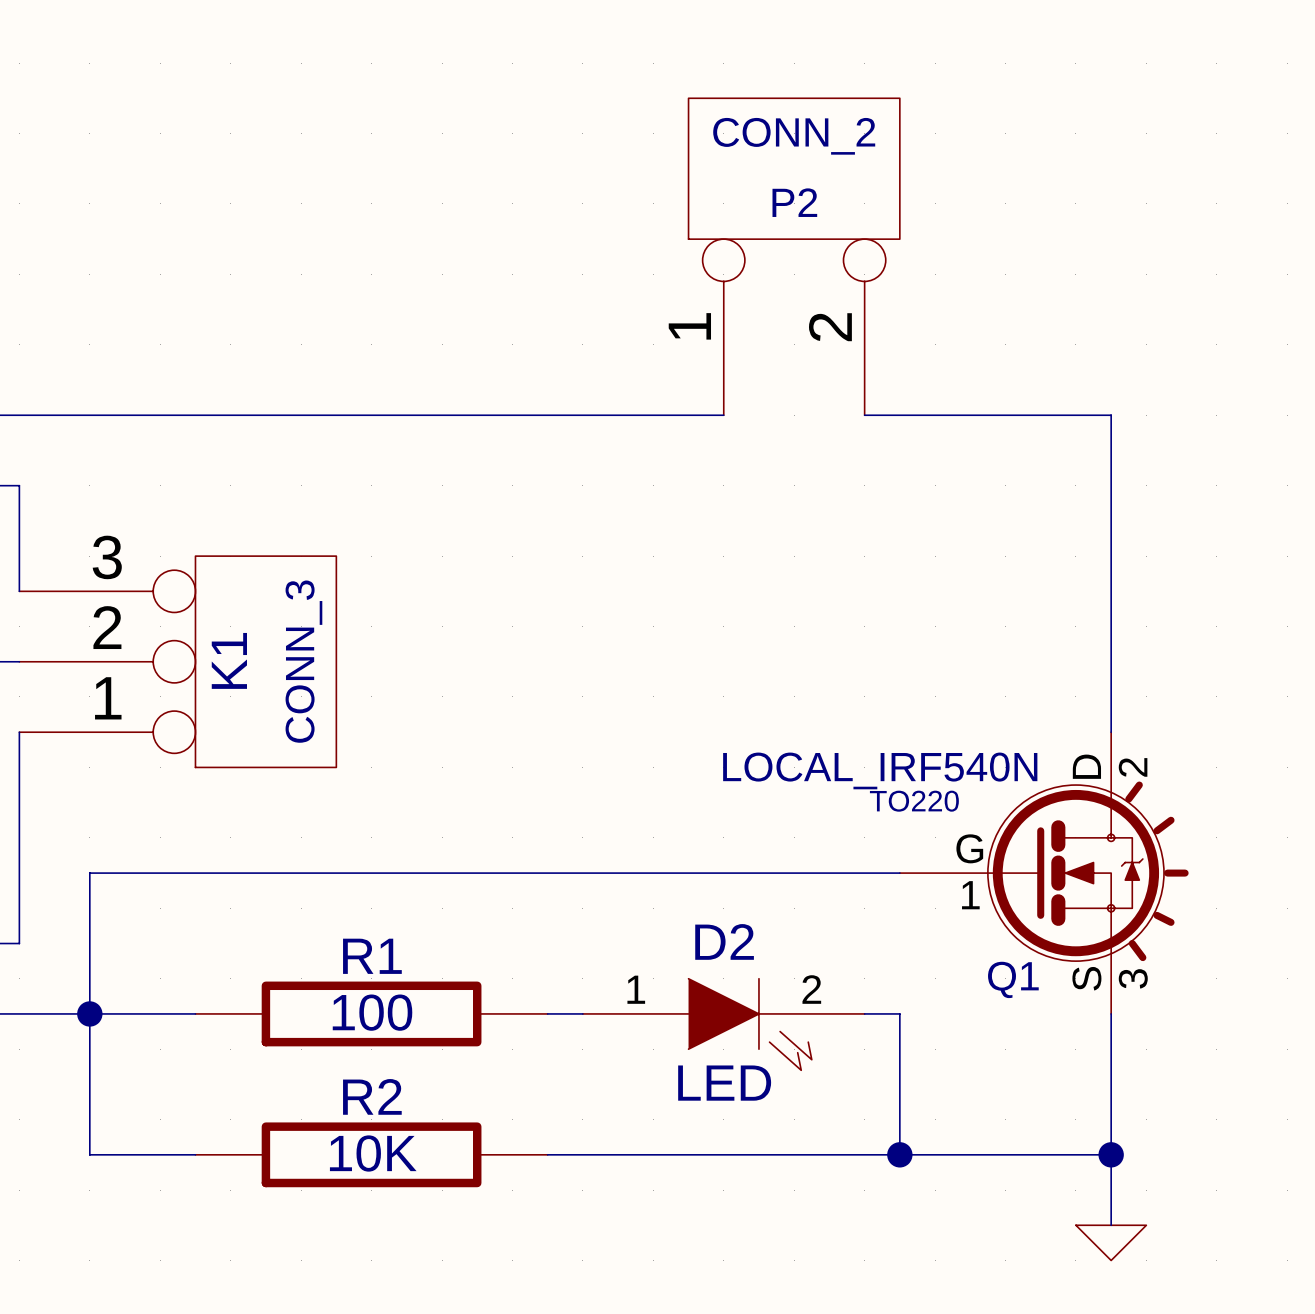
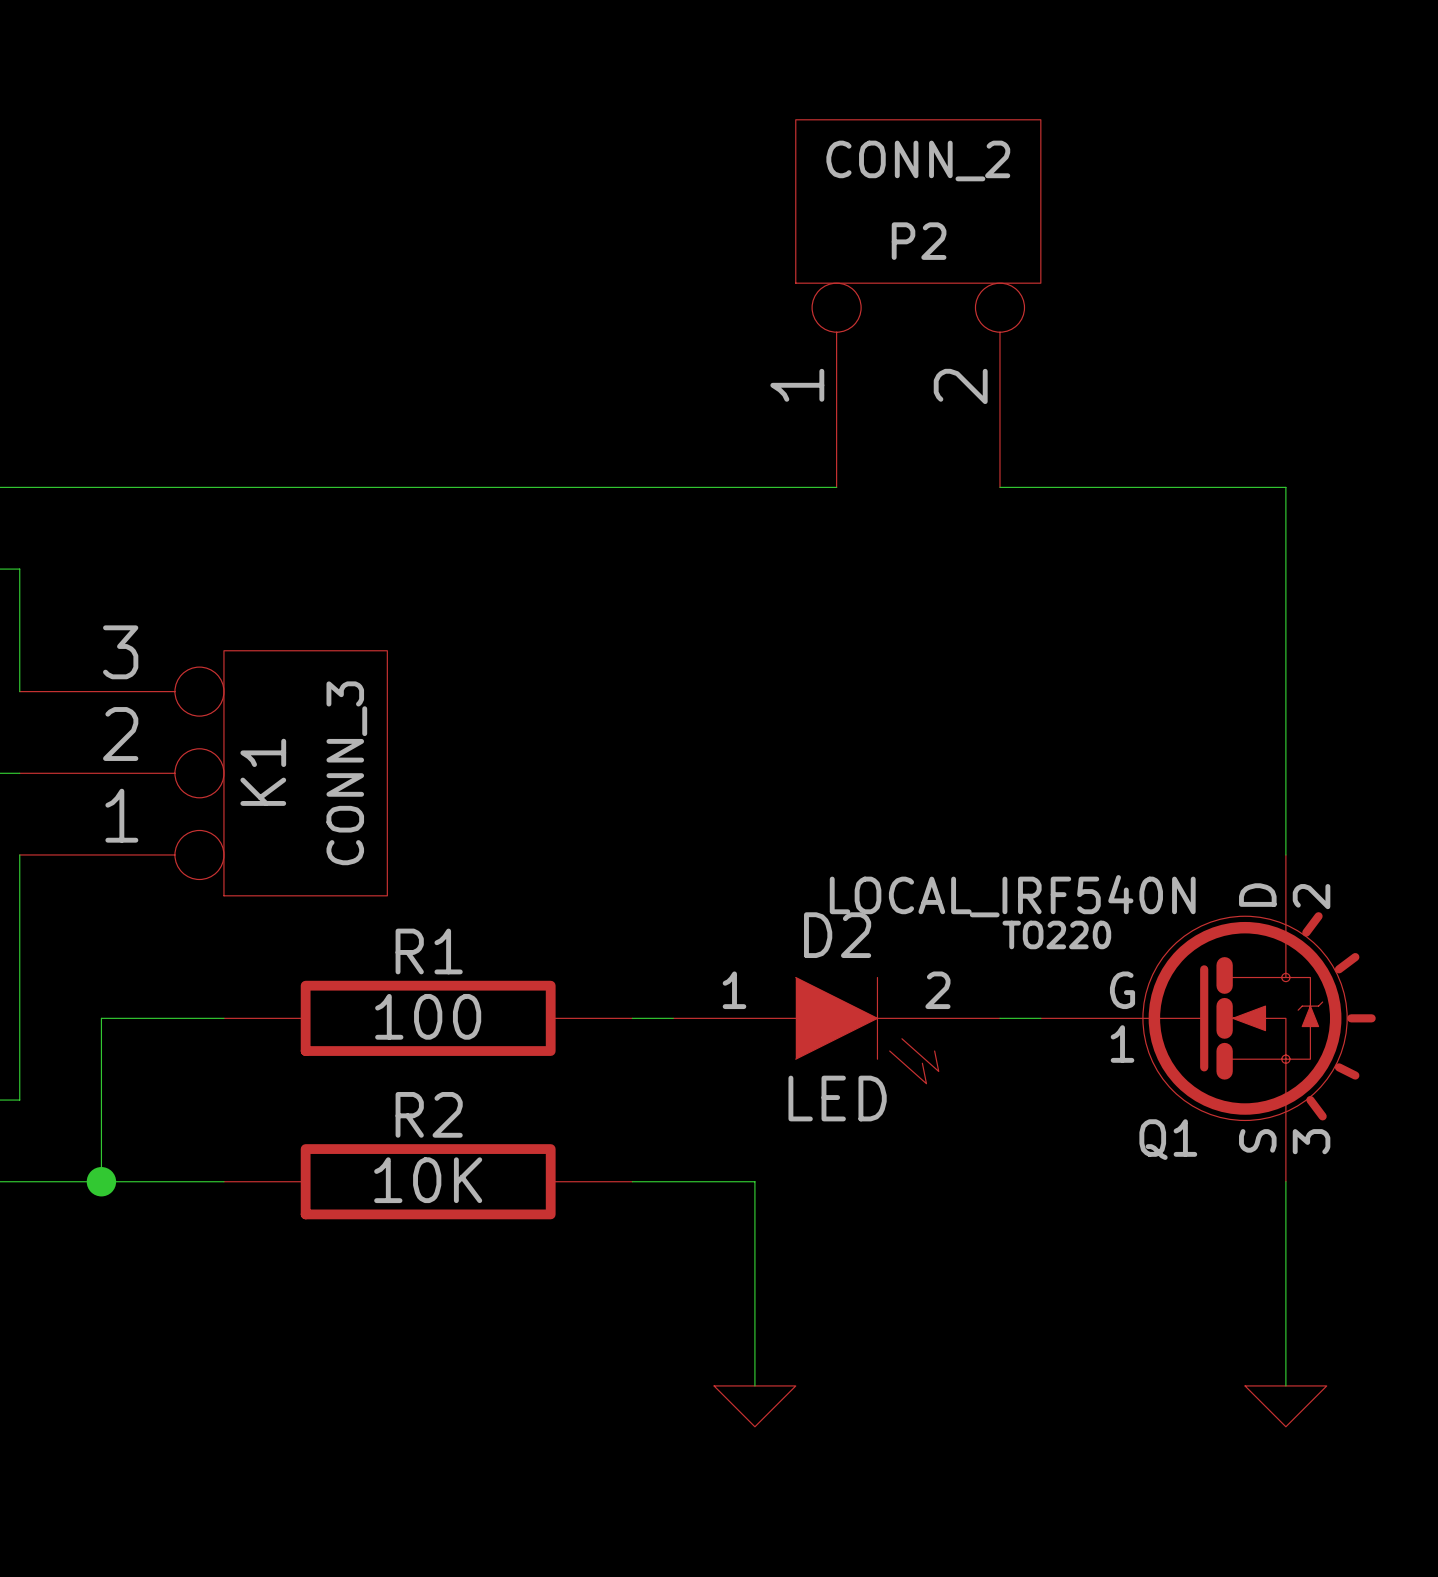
wire: (195, 873) (547, 873) -> none
R1: none -> 100 (428, 1018)
R1 name: R1 (372, 956) -> R2 (429, 1114)
R1 value: 100 (372, 1012) -> 10K (428, 1180)
wire: (89, 1013) (89, 1154) (195, 1154) -> none
wire: none -> (673, 1181) (754, 1181) (754, 1385)
wire: (864, 1013) (899, 1013) (899, 1154) -> none
D2 position: (723, 1024) -> (836, 1030)
R2: 10K (371, 1154) -> none
wire: (547, 1154) (1111, 1154) -> none
junction: (899, 1154) -> none
junction: (1111, 1154) -> none
wire: (1111, 1190) (1111, 1225) -> none
power symbol: none -> (754, 1406)
power symbol position: (1111, 1242) -> (1285, 1406)

